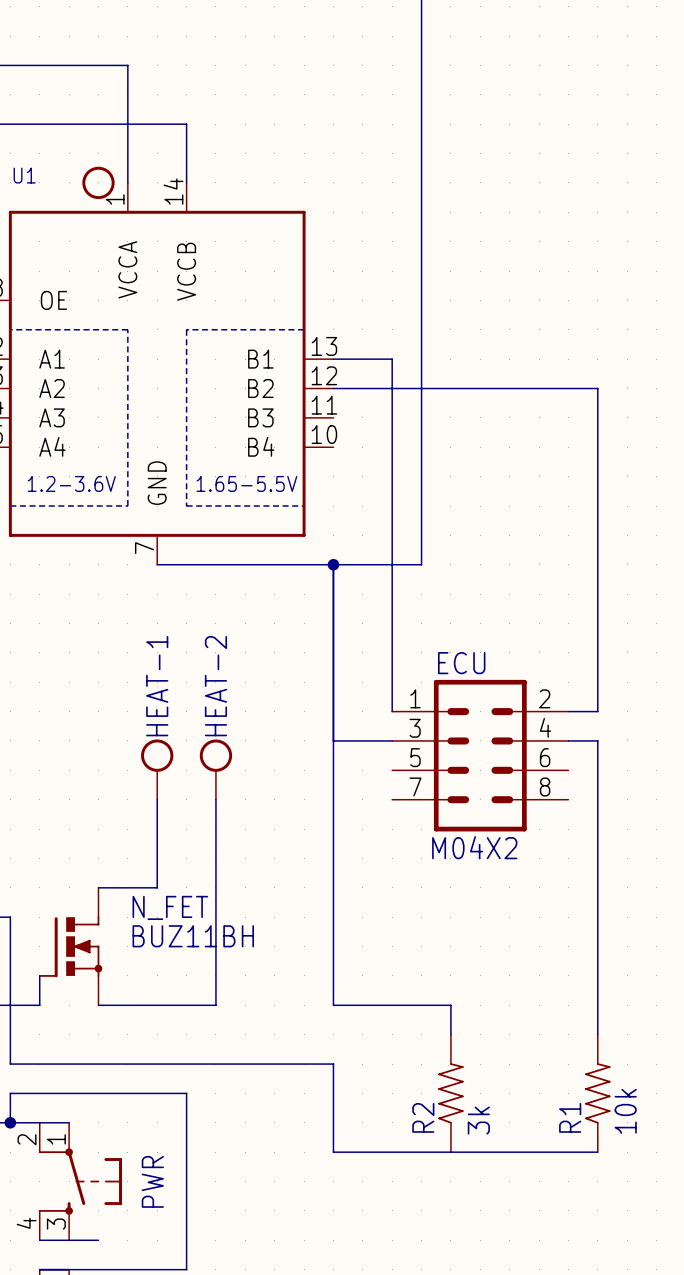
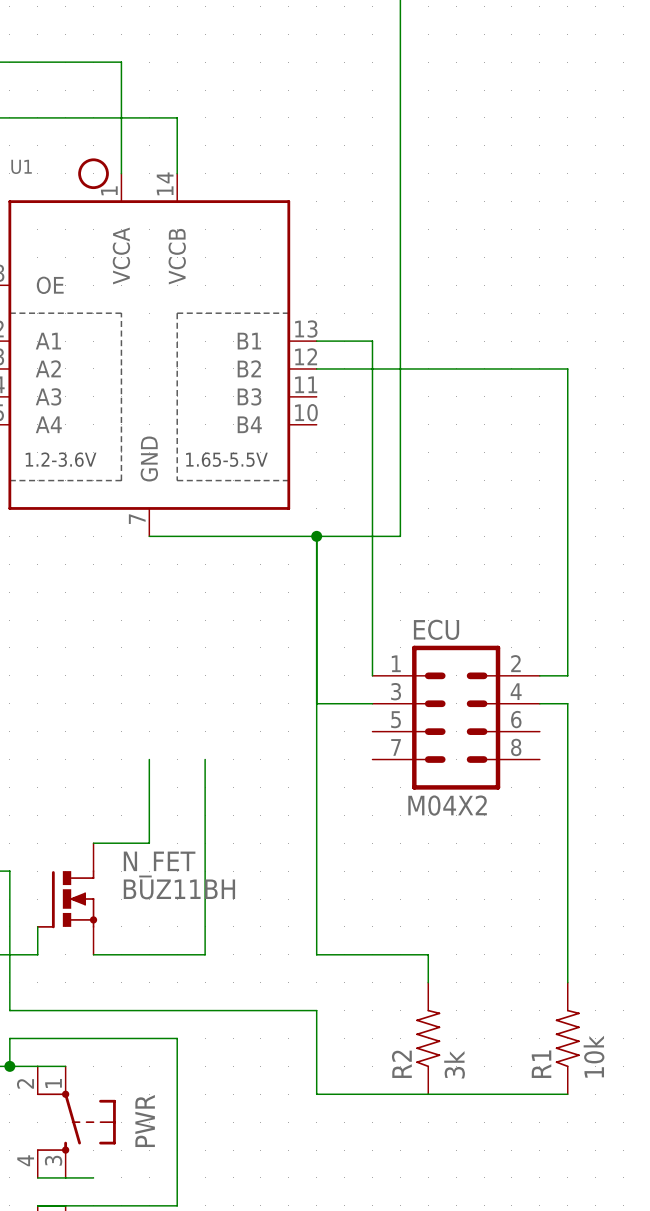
HEAT-1: (157, 769) -> none
HEAT-2: (215, 769) -> none

